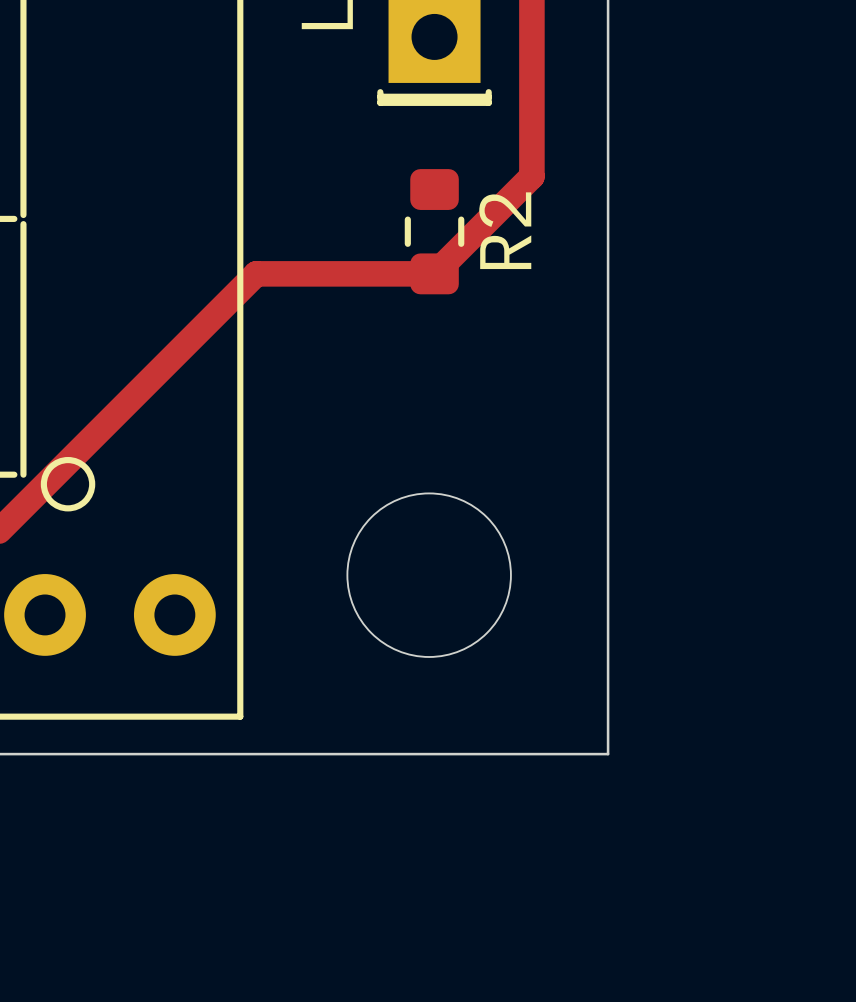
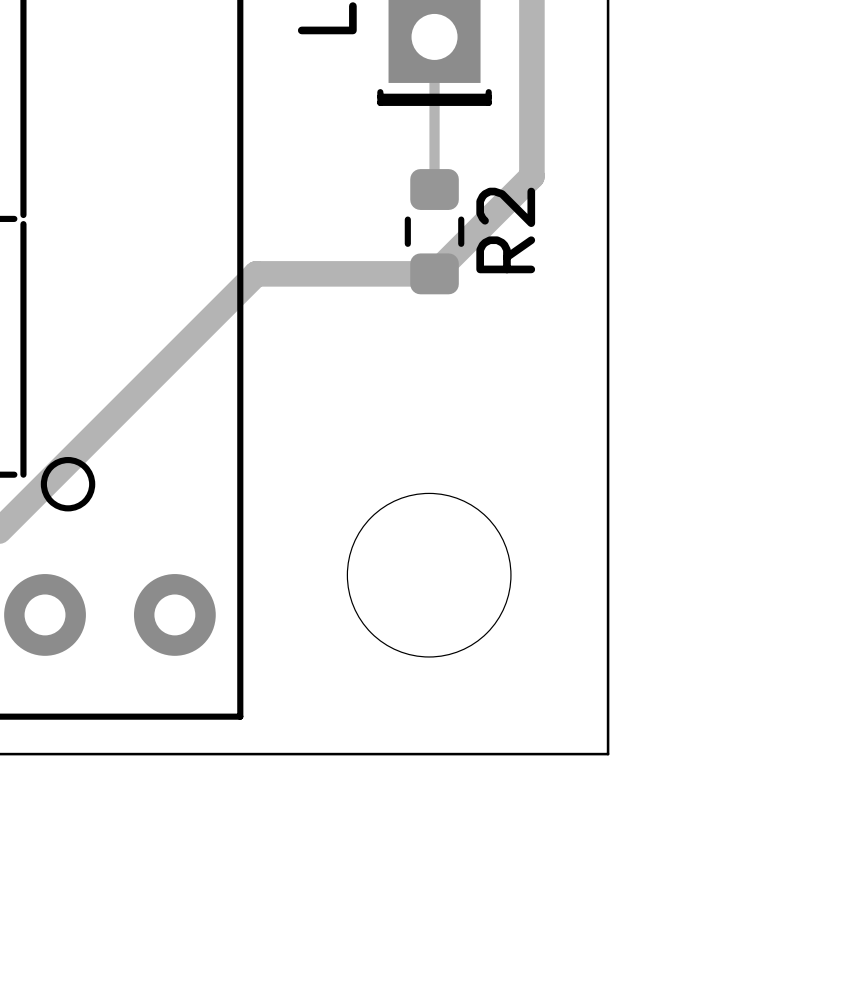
track: none -> (434, 36) (434, 189)

